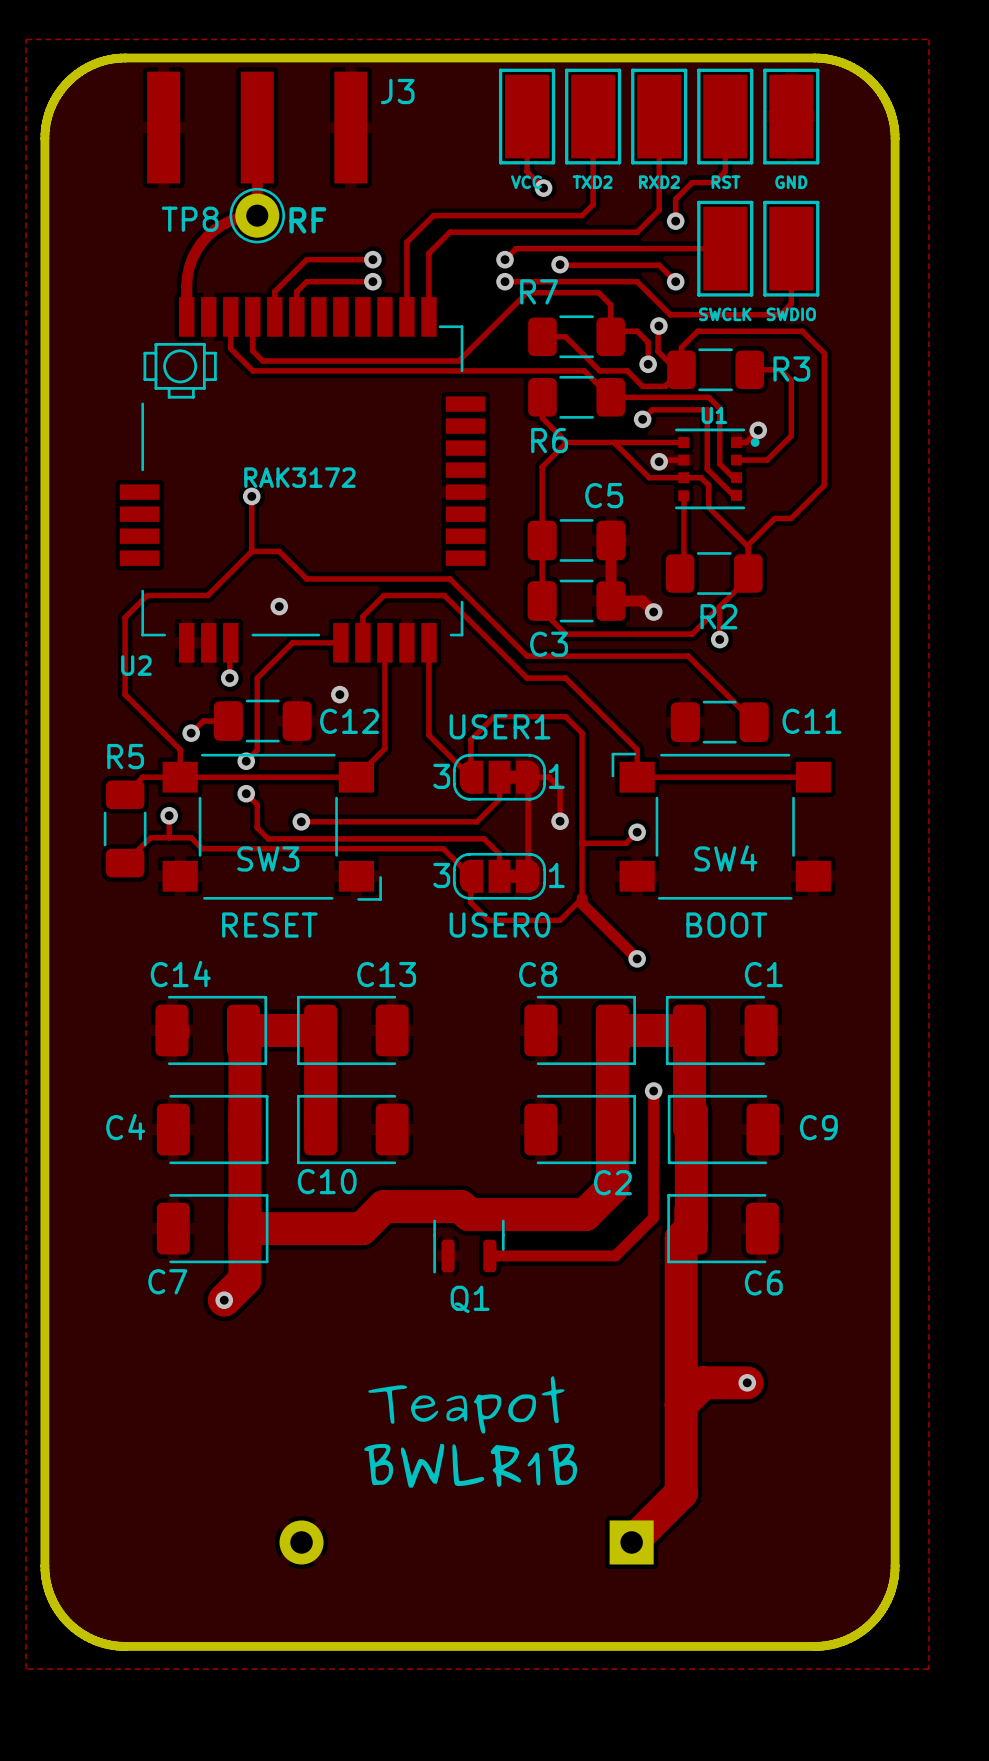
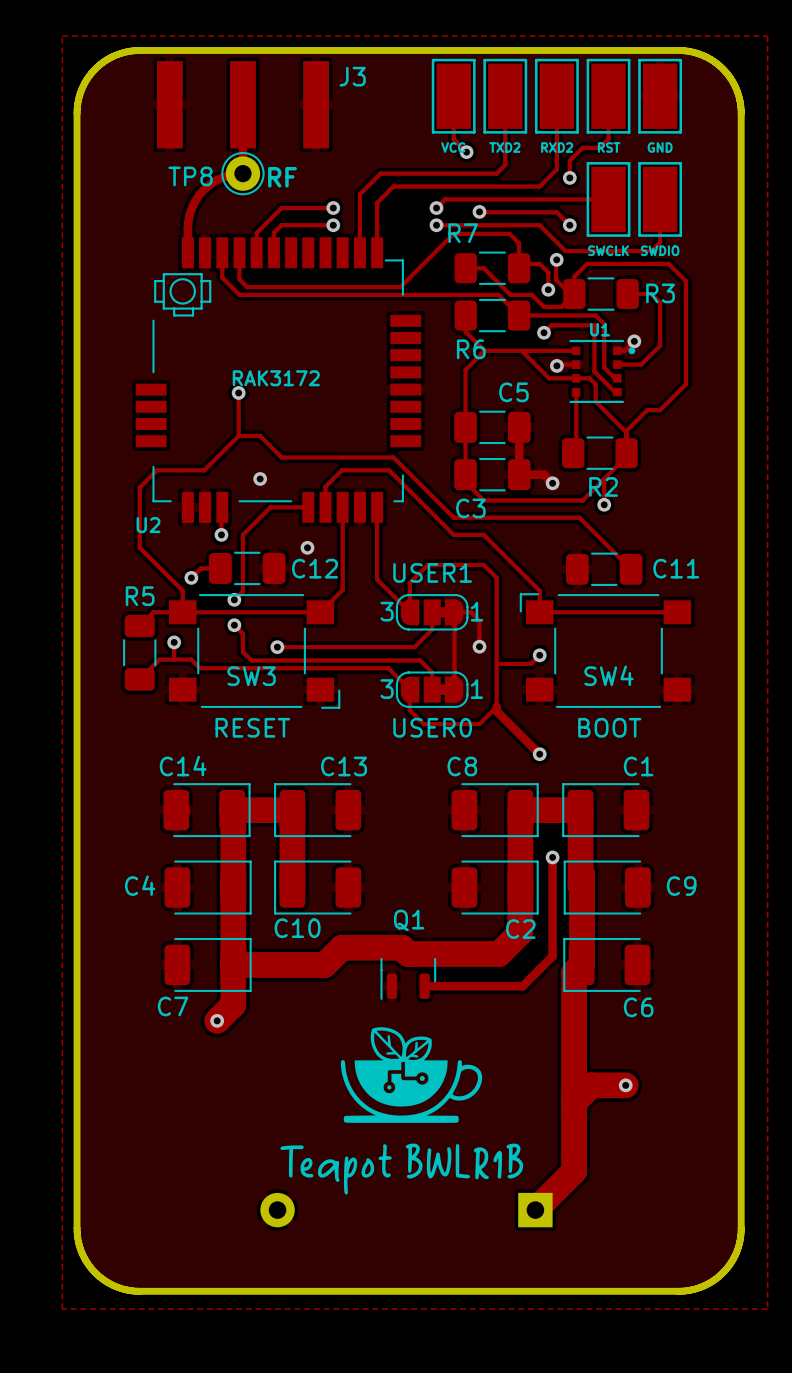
Q1 name position: Q1 (470, 1299) -> Q1 (409, 920)
drawing: none -> [340, 1027, 483, 1123]
drawing: [364, 1376, 578, 1488] -> none
drawing: none -> [280, 1143, 524, 1195]

